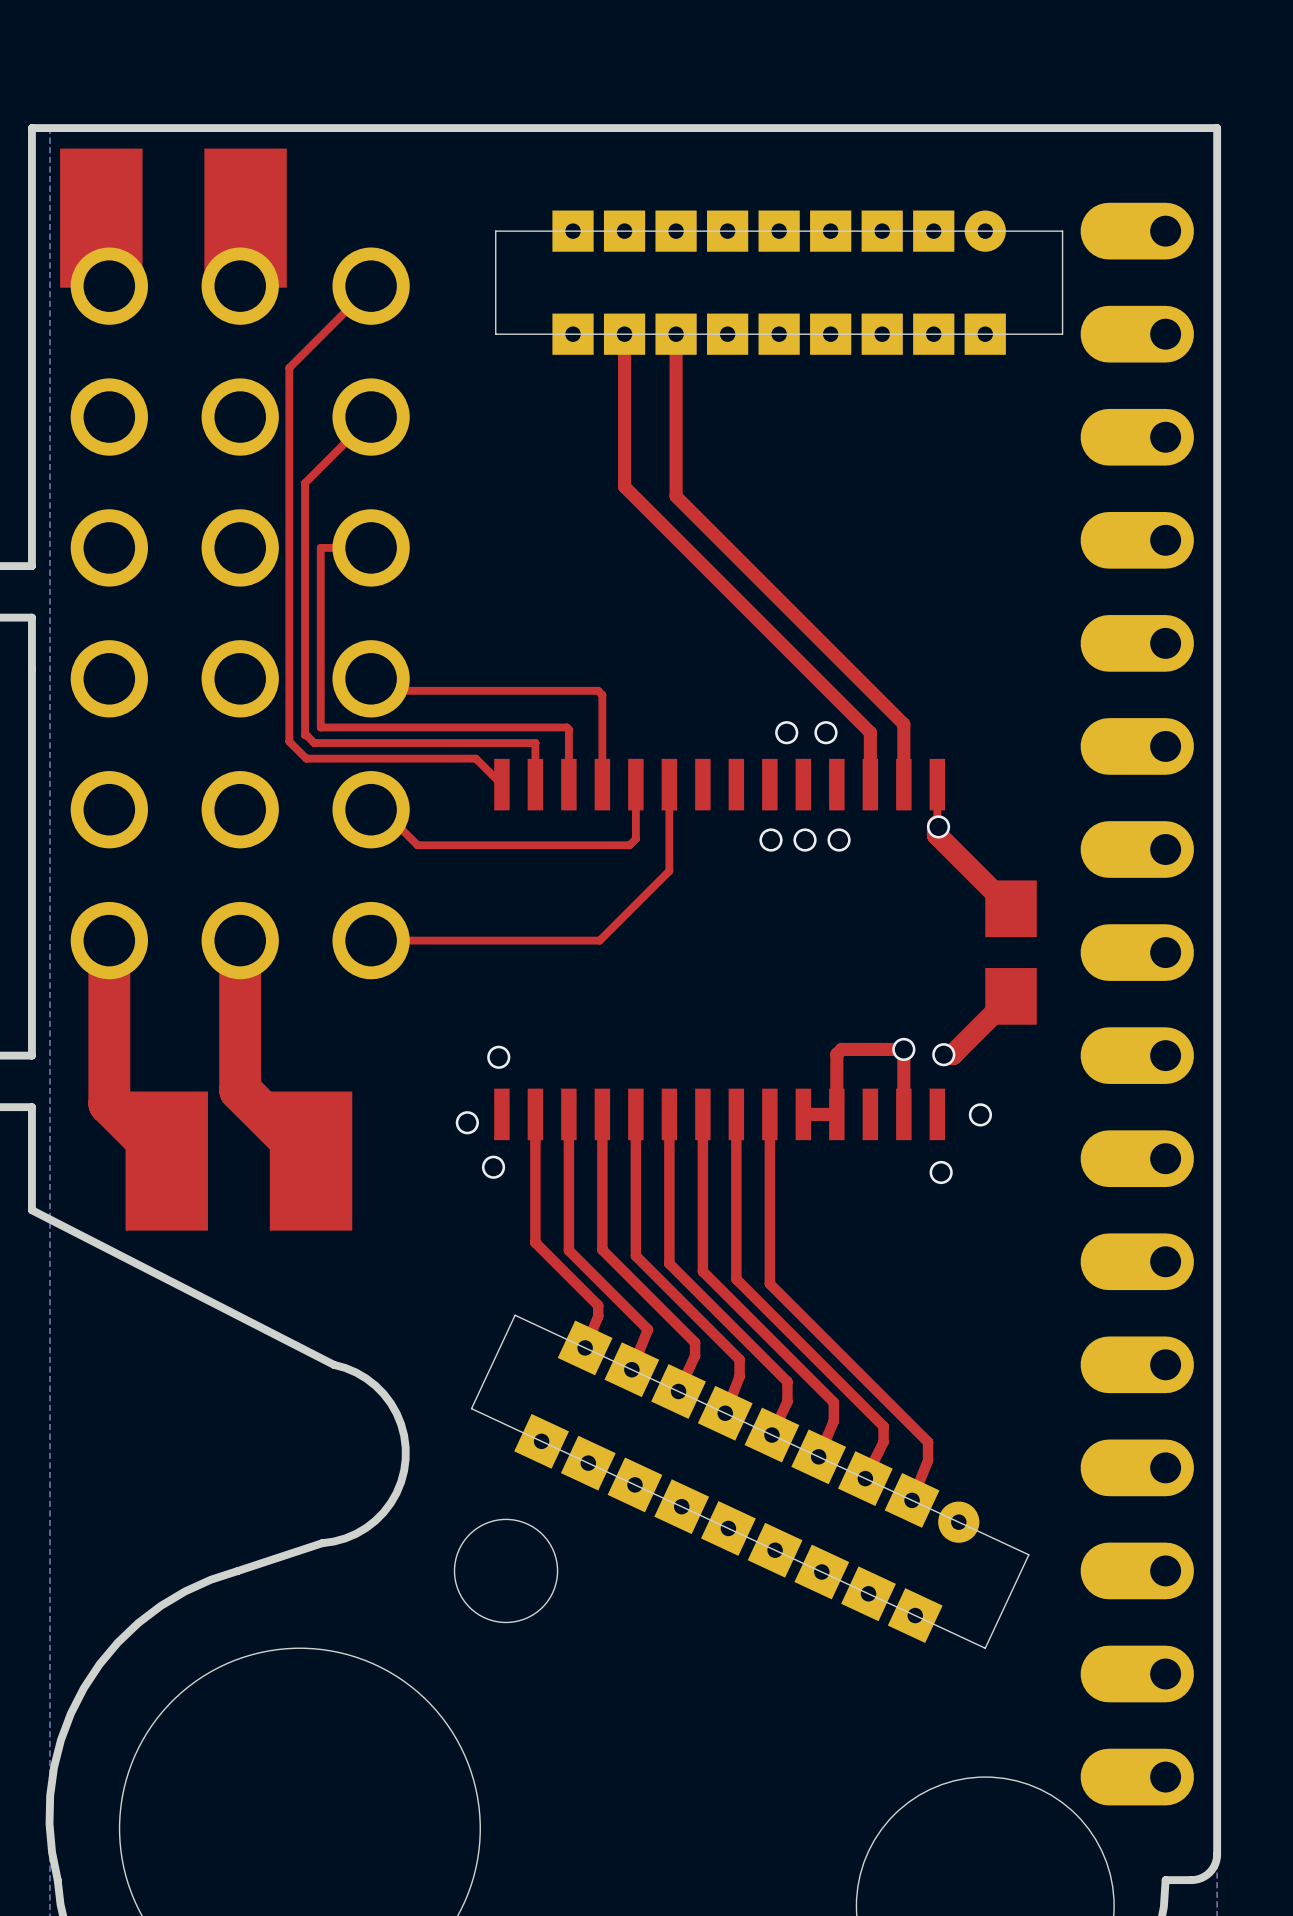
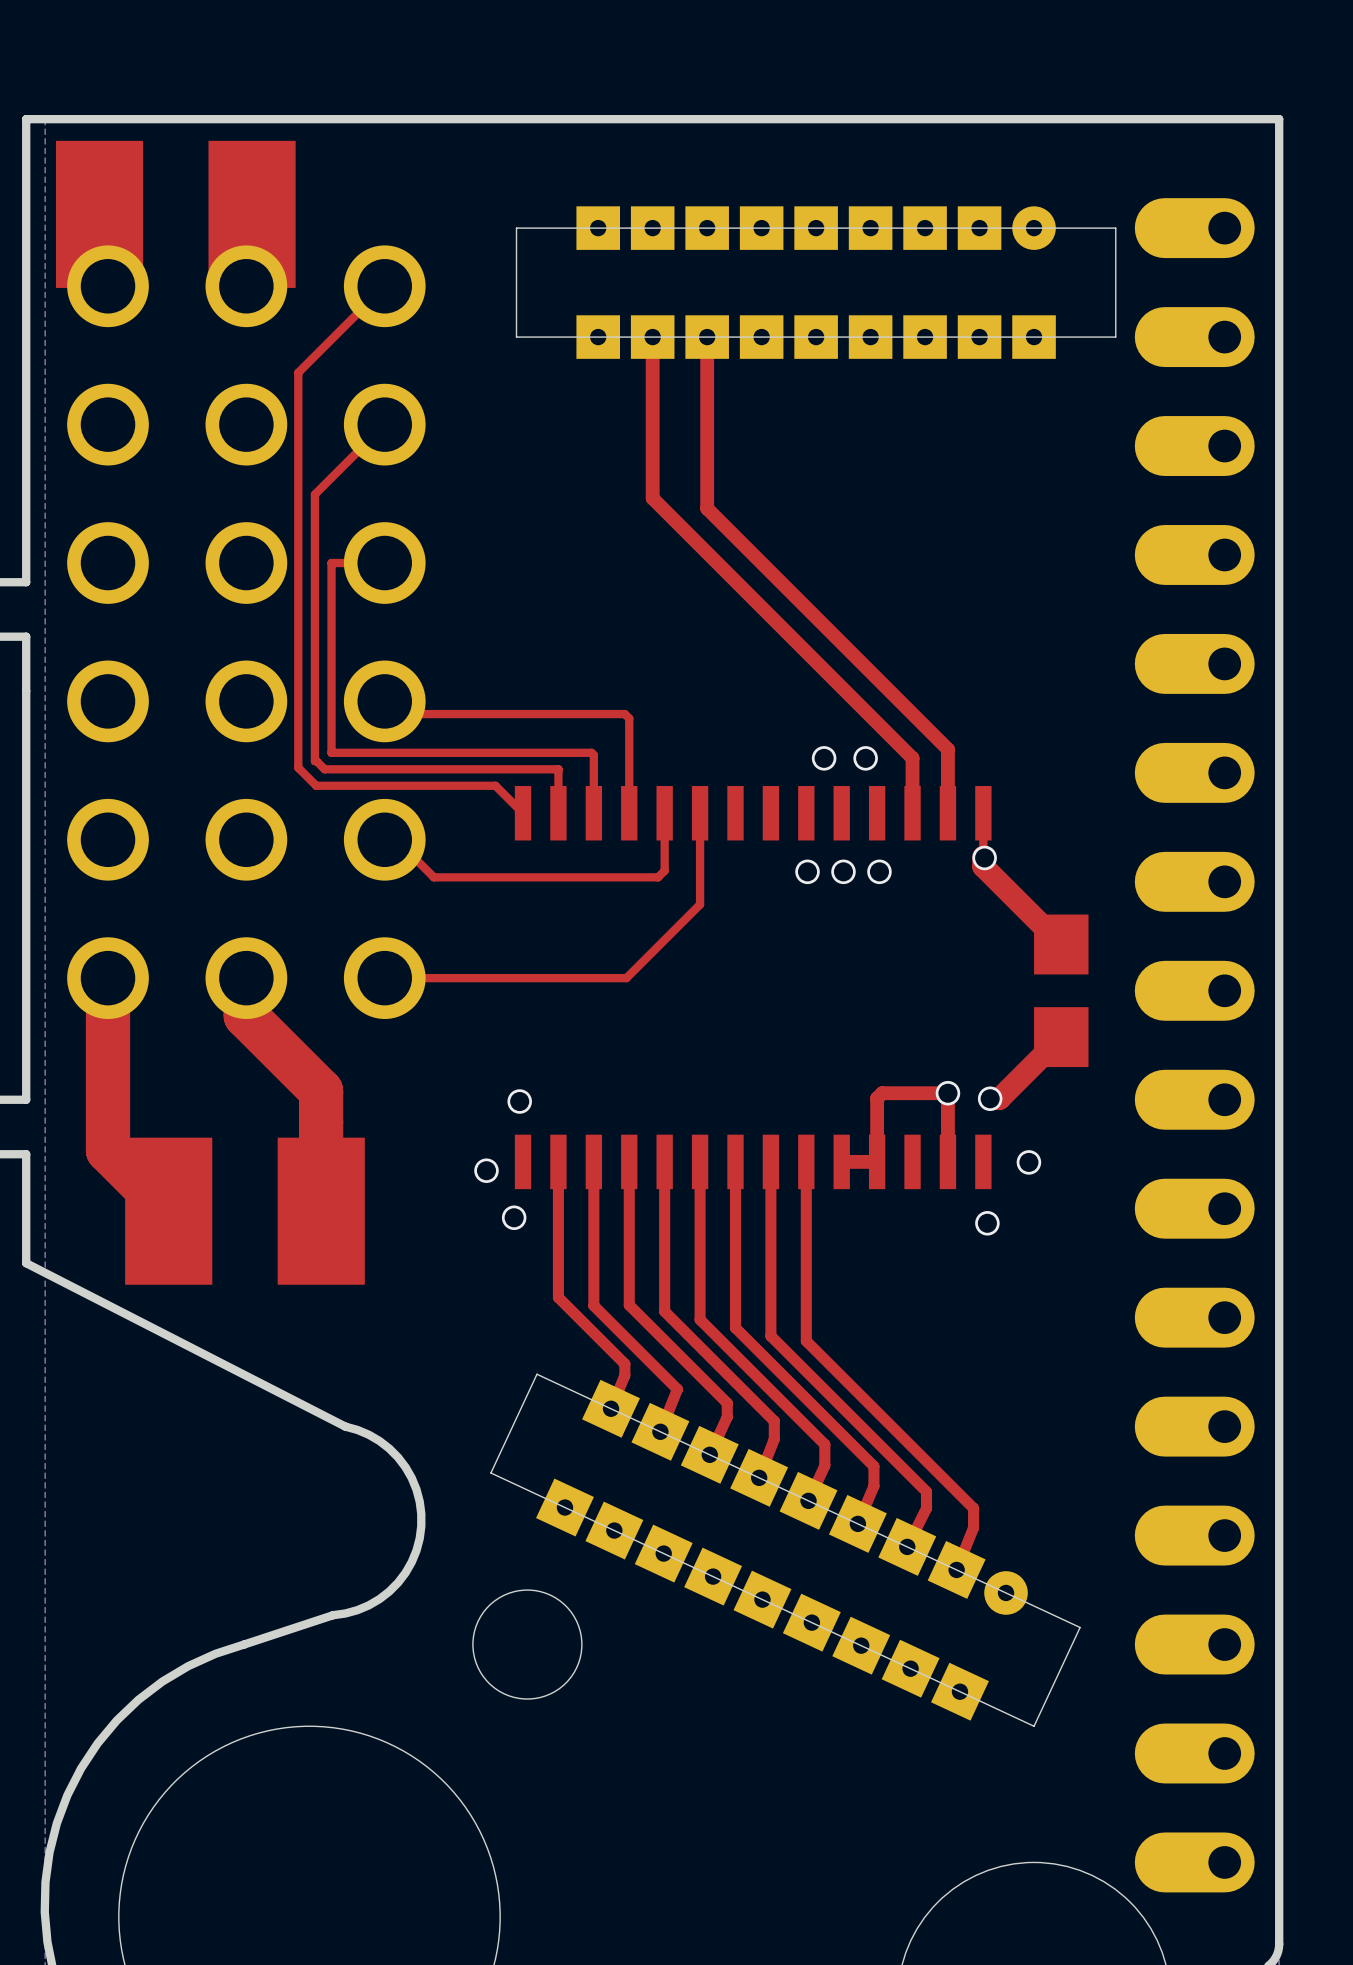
top track: (240, 940) (240, 1090) (311, 1161) -> (246, 978) (245, 1015) (321, 1091) (321, 1211)

